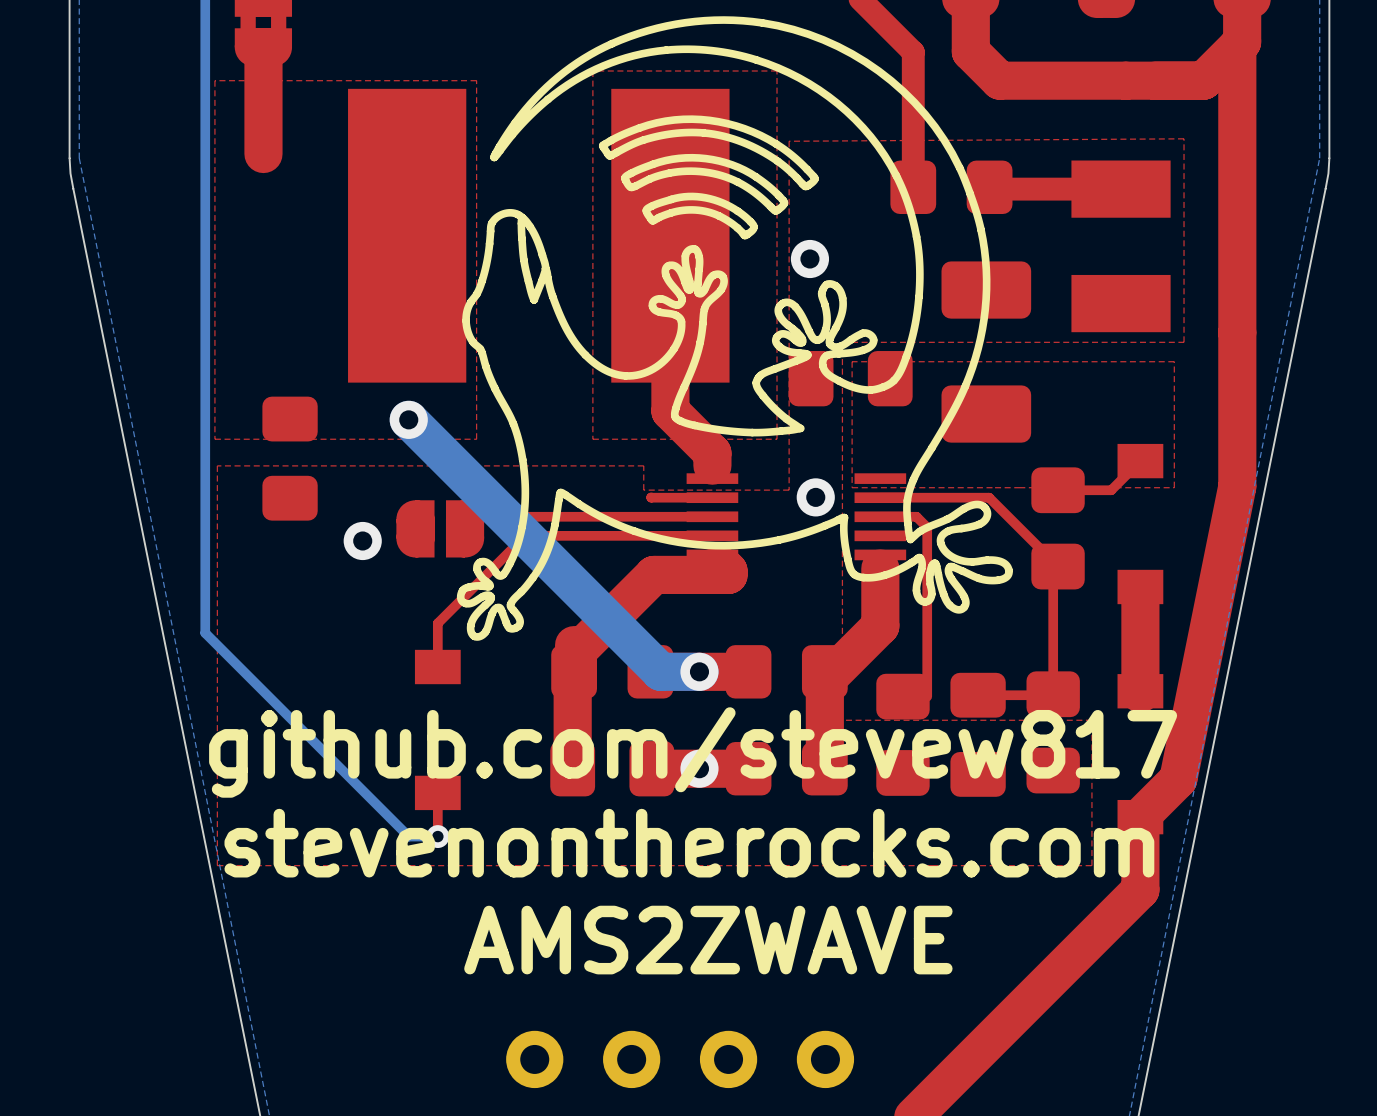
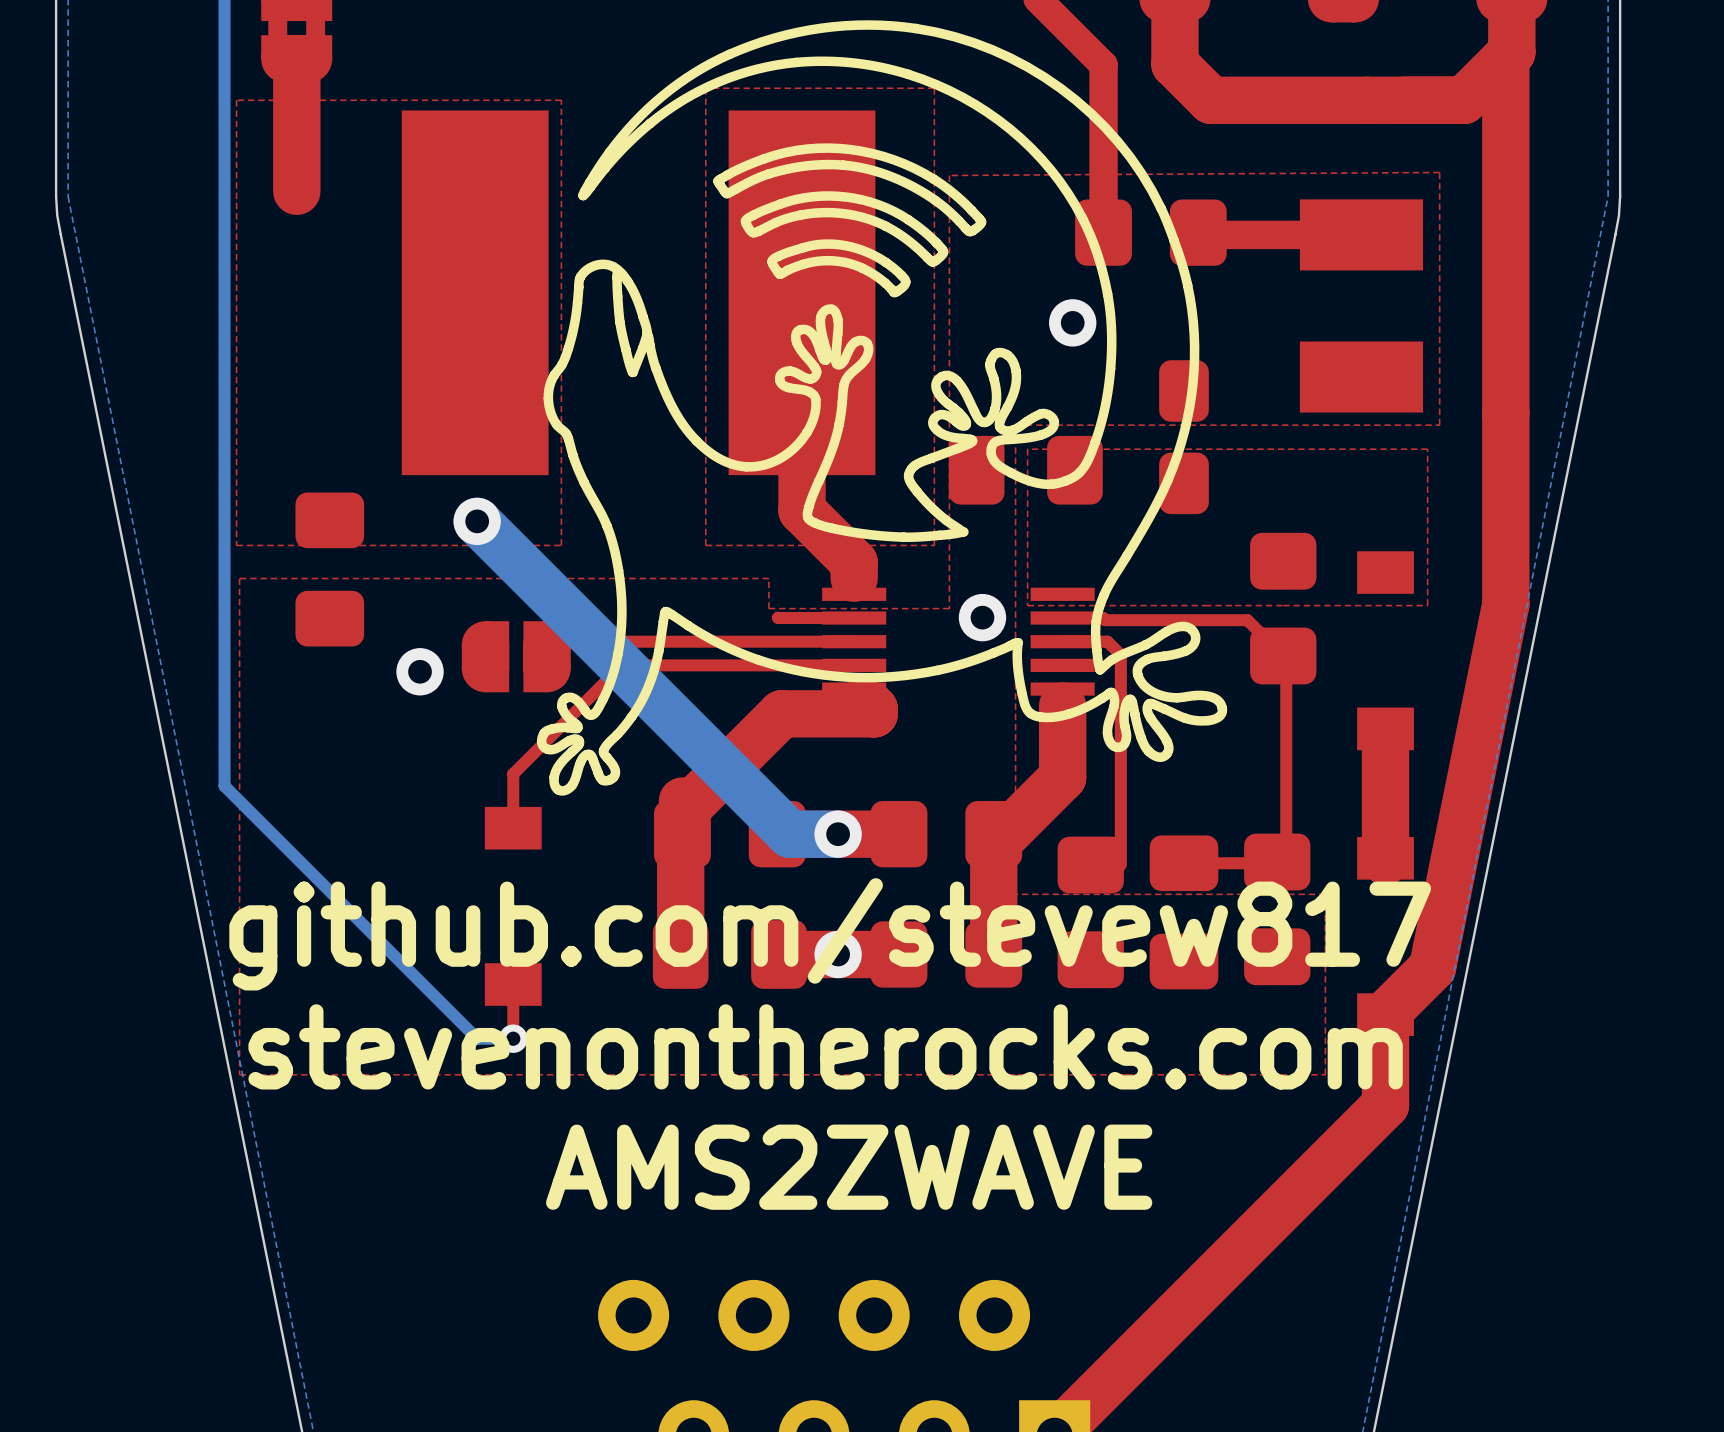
via position: (809, 259) -> (1072, 322)
part footprint: [941, 261, 1032, 443] -> [1159, 360, 1209, 515]
top track: (1140, 461) (1111, 490) (1058, 490) -> none
top track: (912, 497) (989, 497) (1058, 566) (1053, 571) (1053, 694) -> (1103, 618) (1105, 620) (1247, 620) (1295, 668)
part position: (1058, 528) -> (1283, 608)
top track: none -> (1286, 658) (1285, 863)

